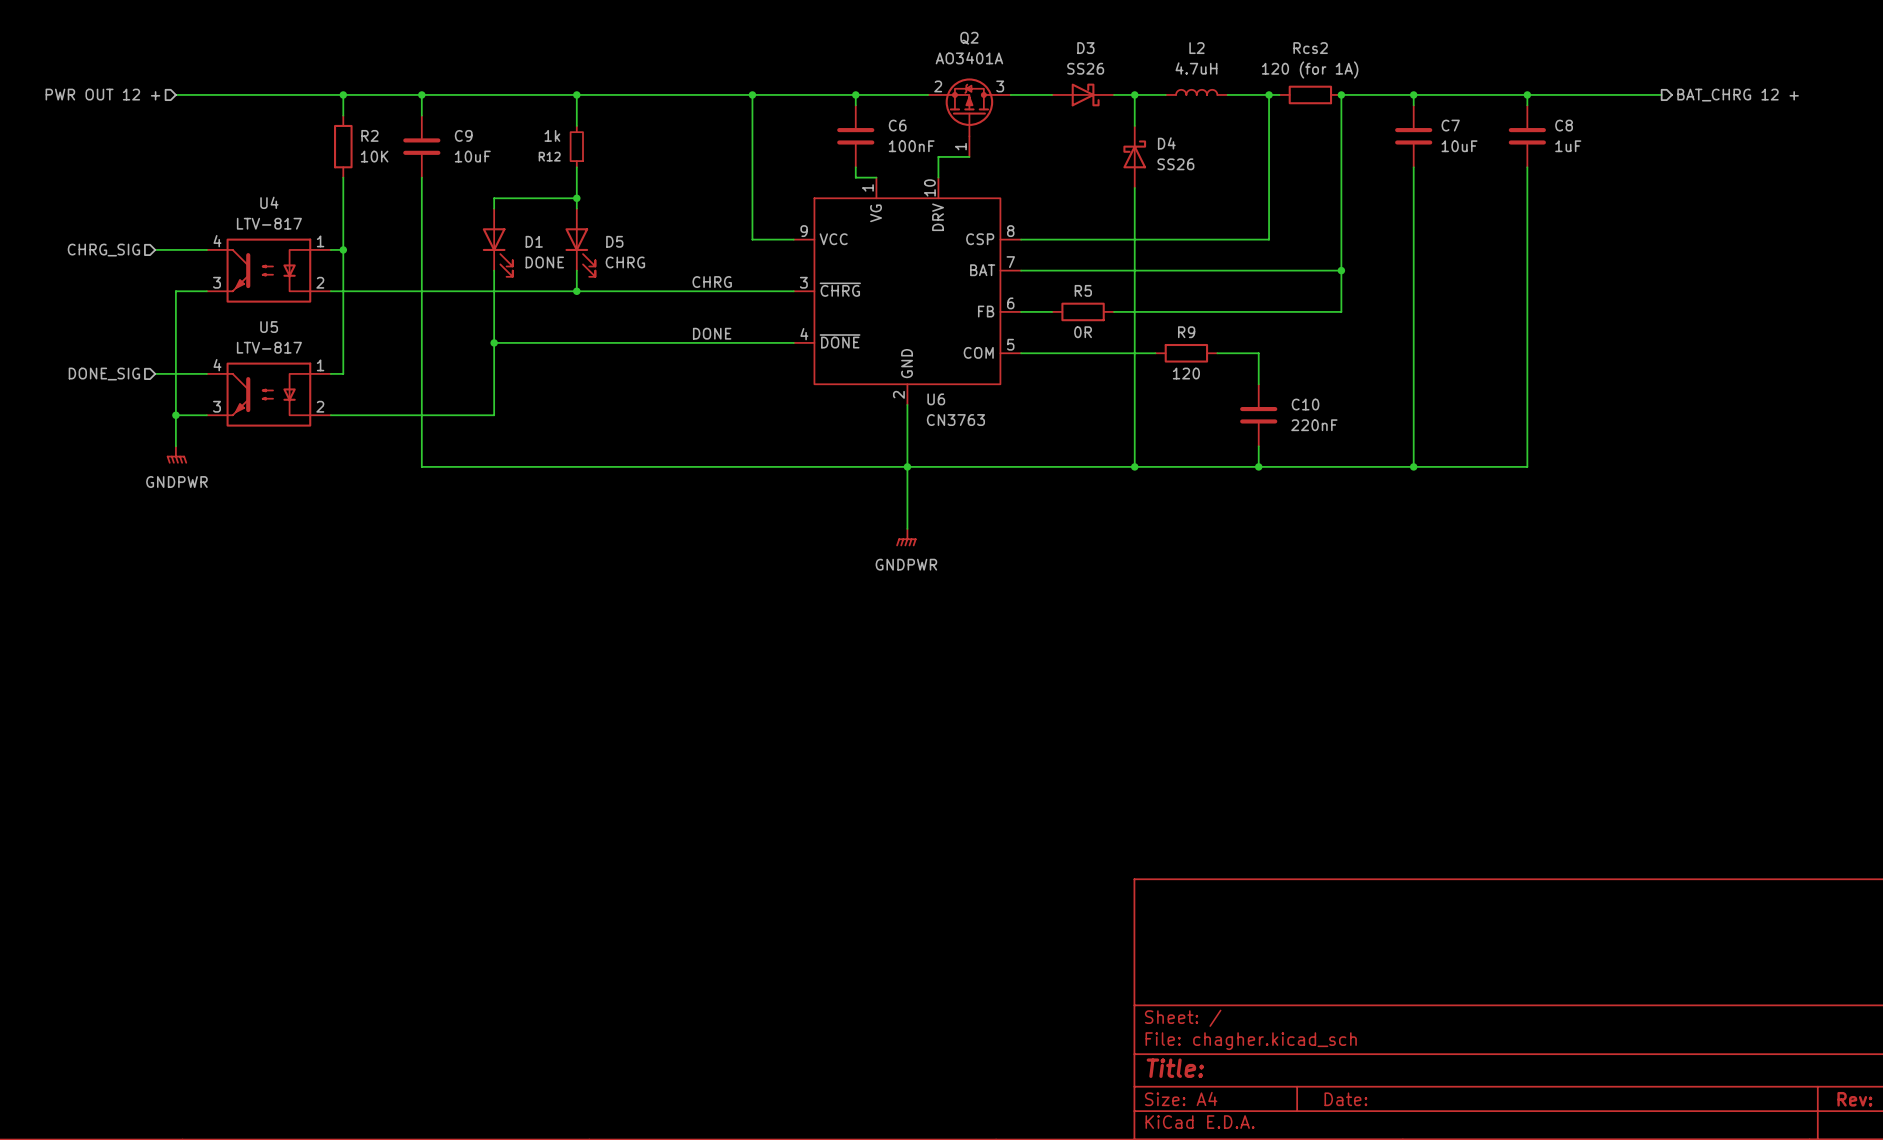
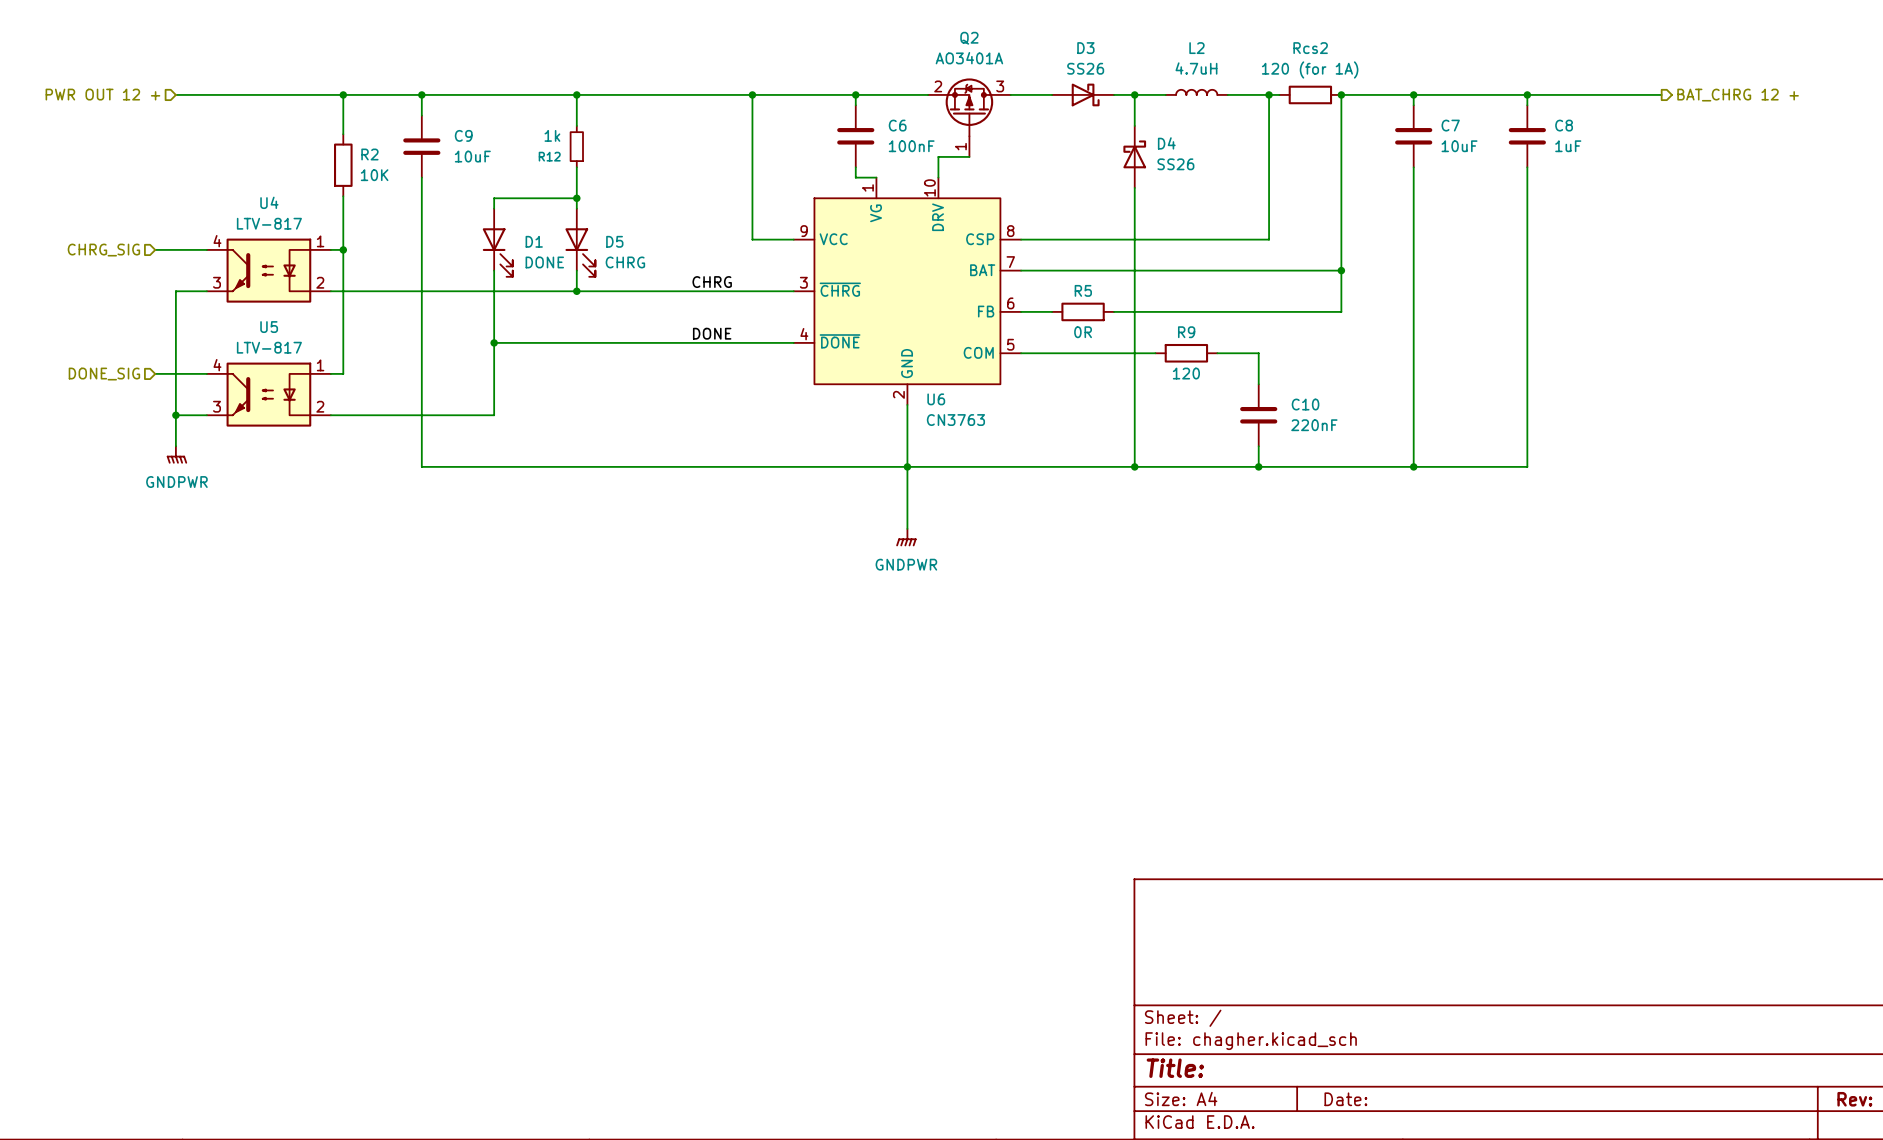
R2 position: (343, 146) -> (343, 165)

